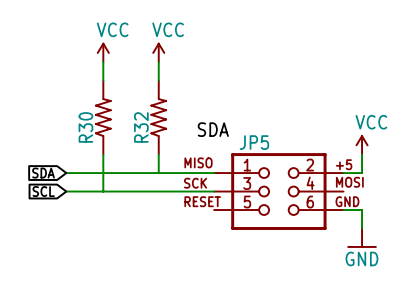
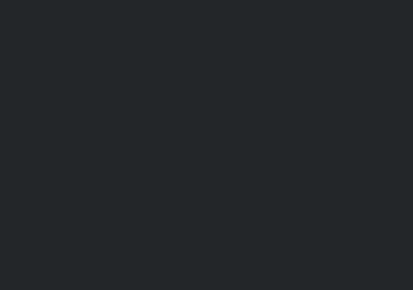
power symbol: VCC (103, 52) -> none
power symbol: VCC (158, 52) -> none
wire: (103, 62) (103, 80) -> none
wire: (158, 62) (158, 80) -> none
R30: (103, 117) -> none
R32: (158, 117) -> none
label: SDA (213, 129) -> none
power symbol: VCC (362, 144) -> none
wire: (103, 154) (103, 191) -> none
wire: (158, 154) (158, 173) -> none
wire: (362, 154) (362, 173) (343, 173) -> none
global label: SDA (43, 173) -> none
wire: (66, 173) (214, 173) -> none
global label: SCL (43, 191) -> none
wire: (66, 191) (214, 191) -> none
JP5: (278, 191) -> none
wire: (343, 210) (362, 210) (362, 228) -> none
power symbol: GND (362, 238) -> none

